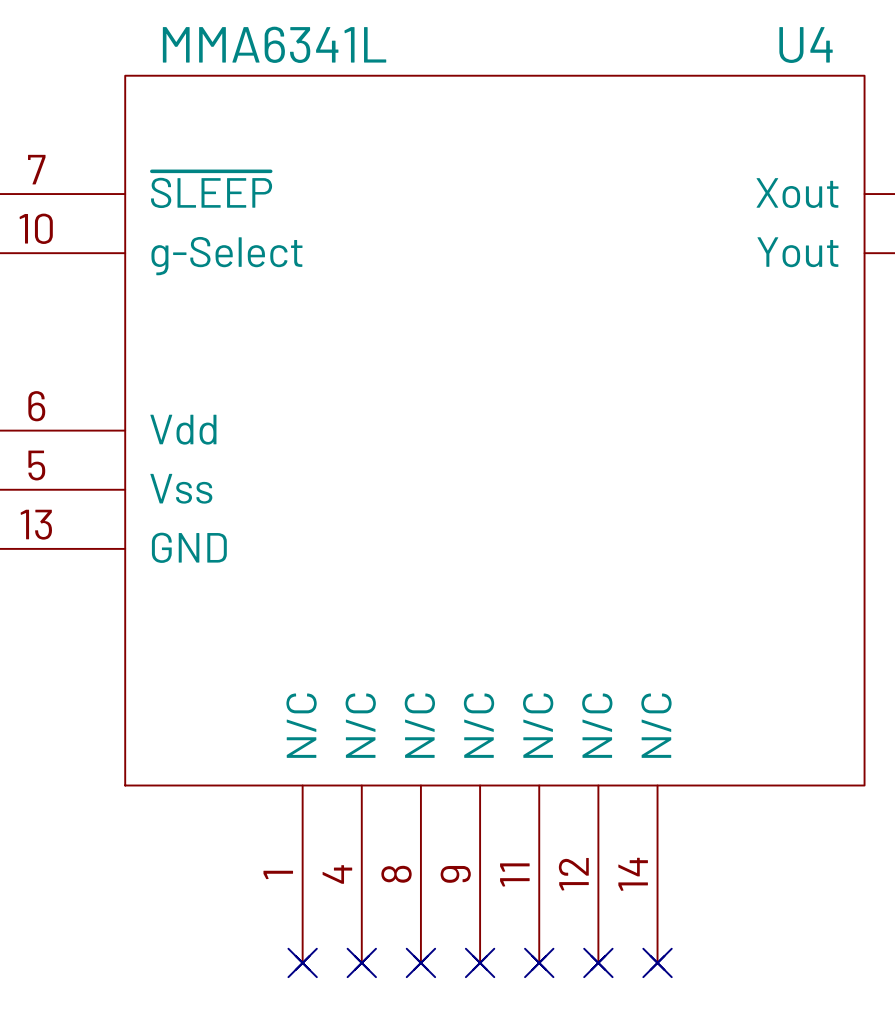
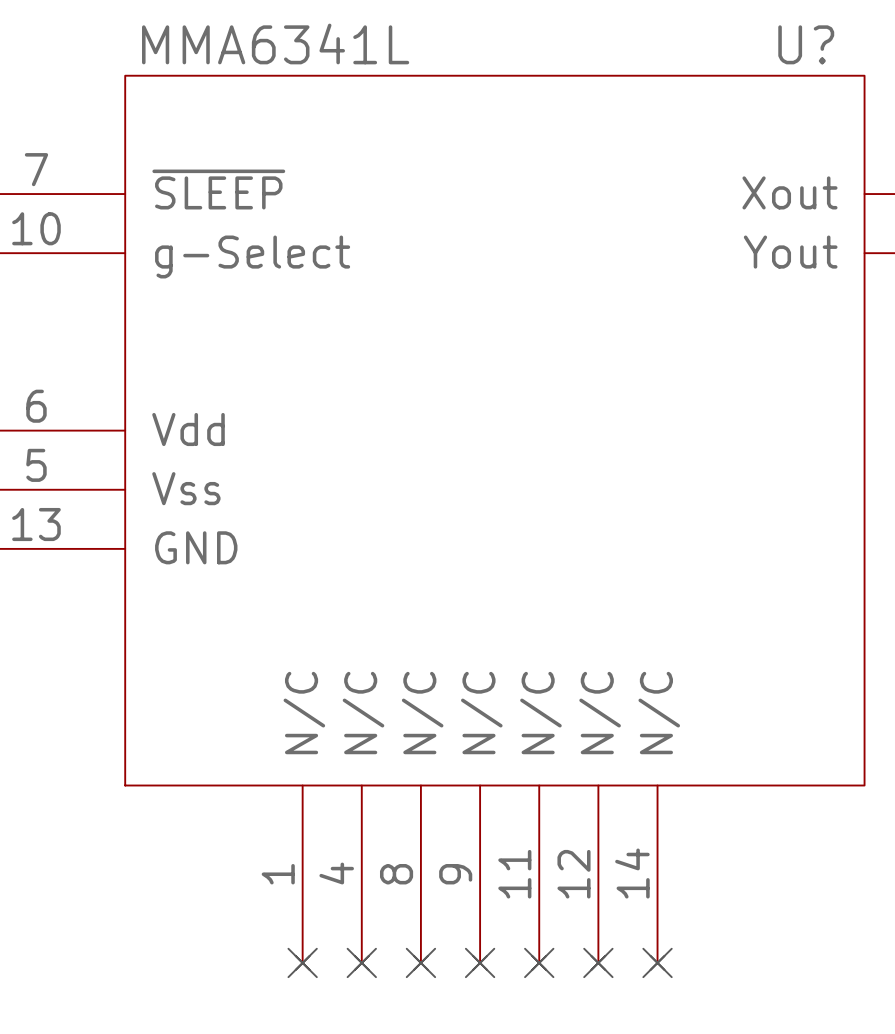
U4 name: U4 (806, 45) -> U? (806, 44)

